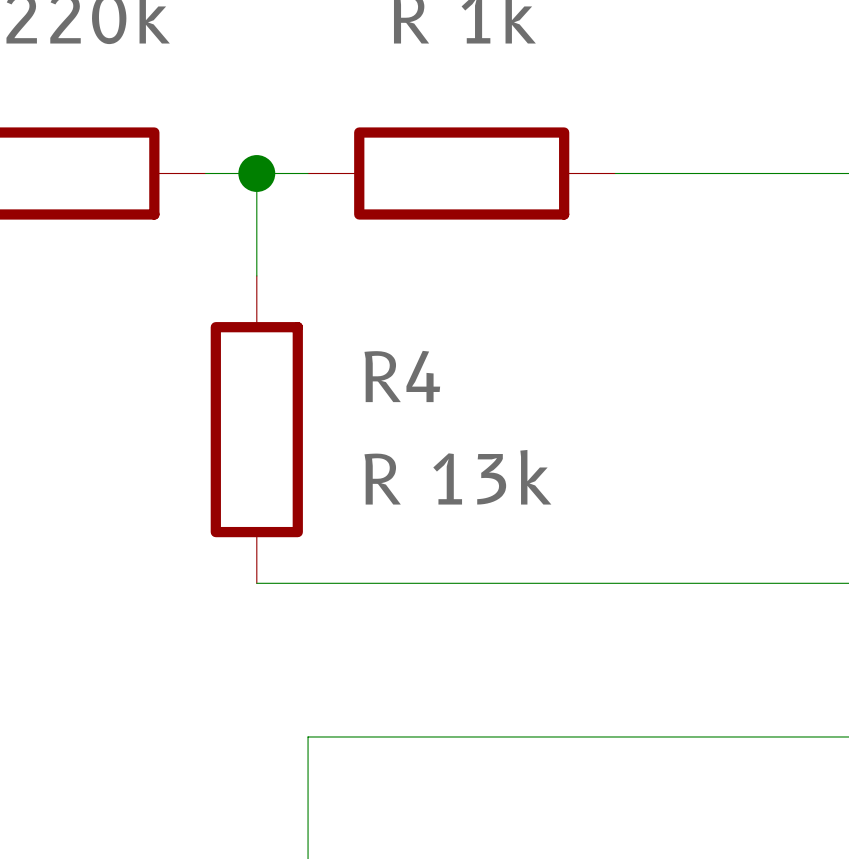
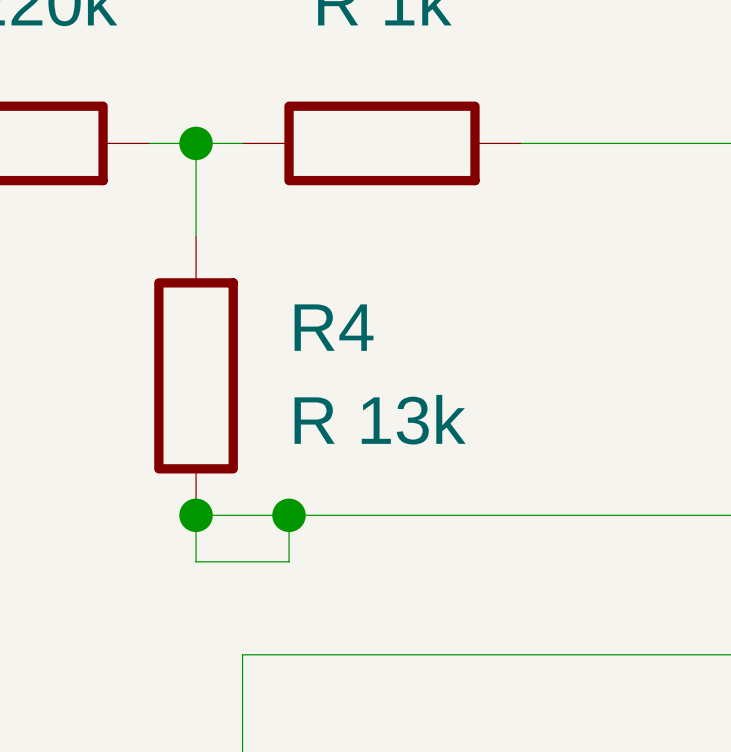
wire: none -> (196, 515) (196, 561) (289, 561) (289, 515)
junction: none -> (196, 515)
junction: none -> (289, 515)

